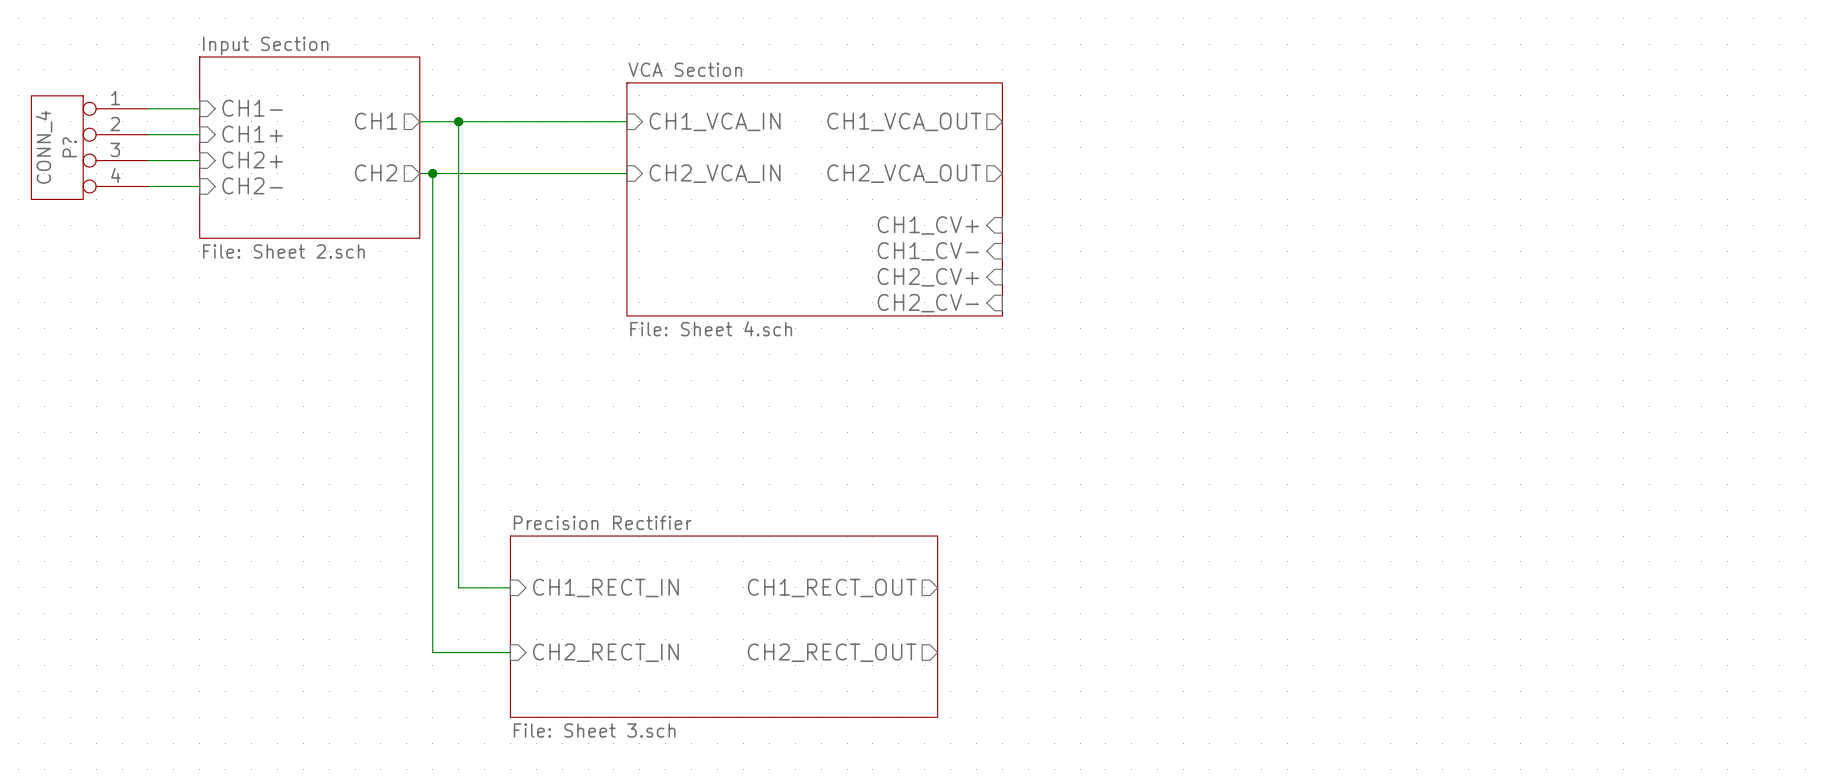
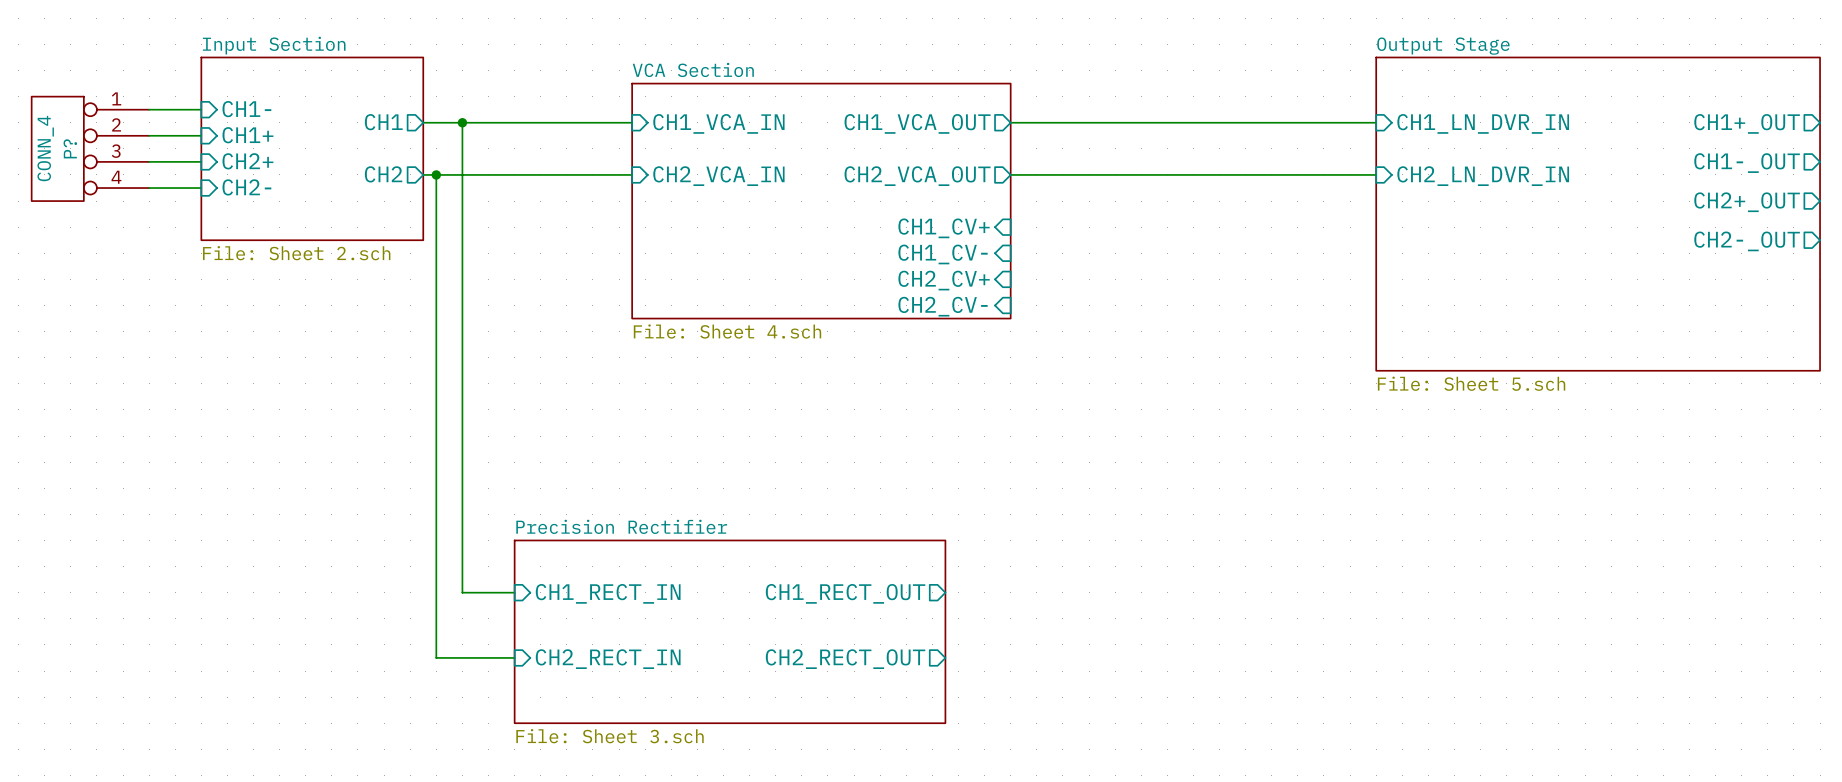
wire: none -> (1010, 122) (1376, 122)
sheet pin: none -> CH1_LN_DVR_IN (1483, 123)
sheet pin: none -> CH1+_OUT (1747, 123)
sheet pin: none -> CH1-_OUT (1747, 163)
wire: none -> (1010, 174) (1376, 174)
sheet pin: none -> CH2_LN_DVR_IN (1483, 176)
sheet pin: none -> CH2+_OUT (1747, 202)
sheet Output Stage: none -> File: Sheet 5.sch (1598, 214)
sheet pin: none -> CH2-_OUT (1747, 241)

